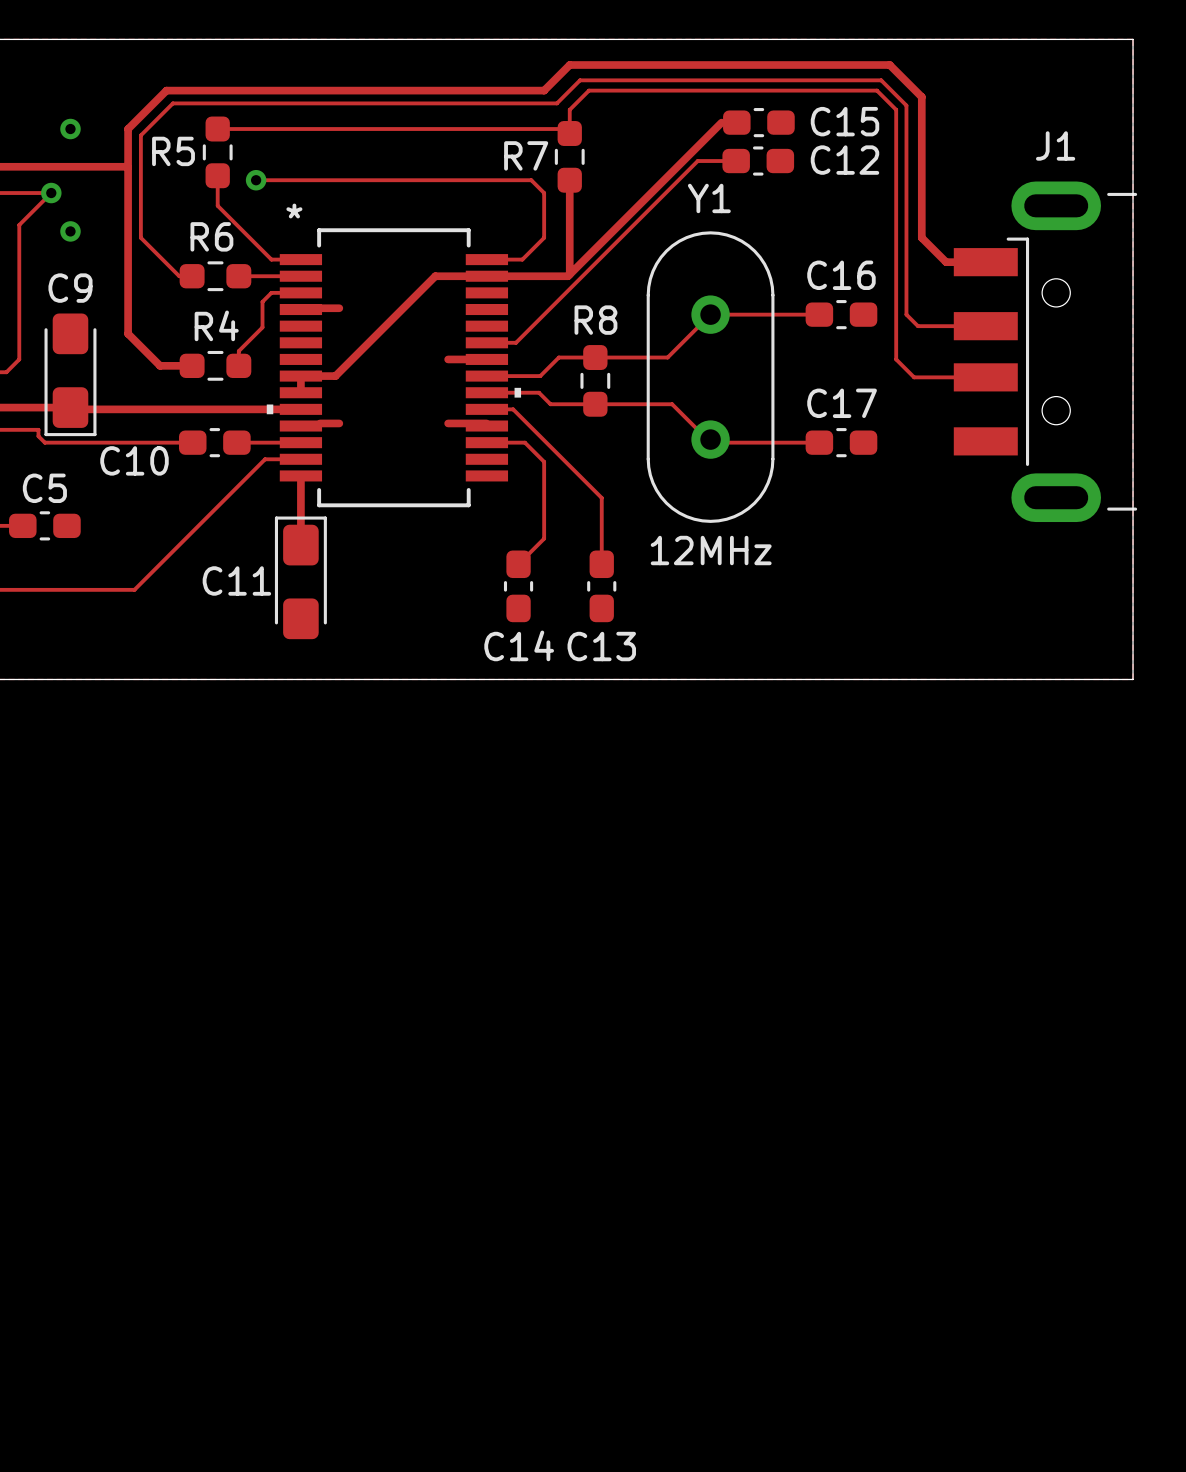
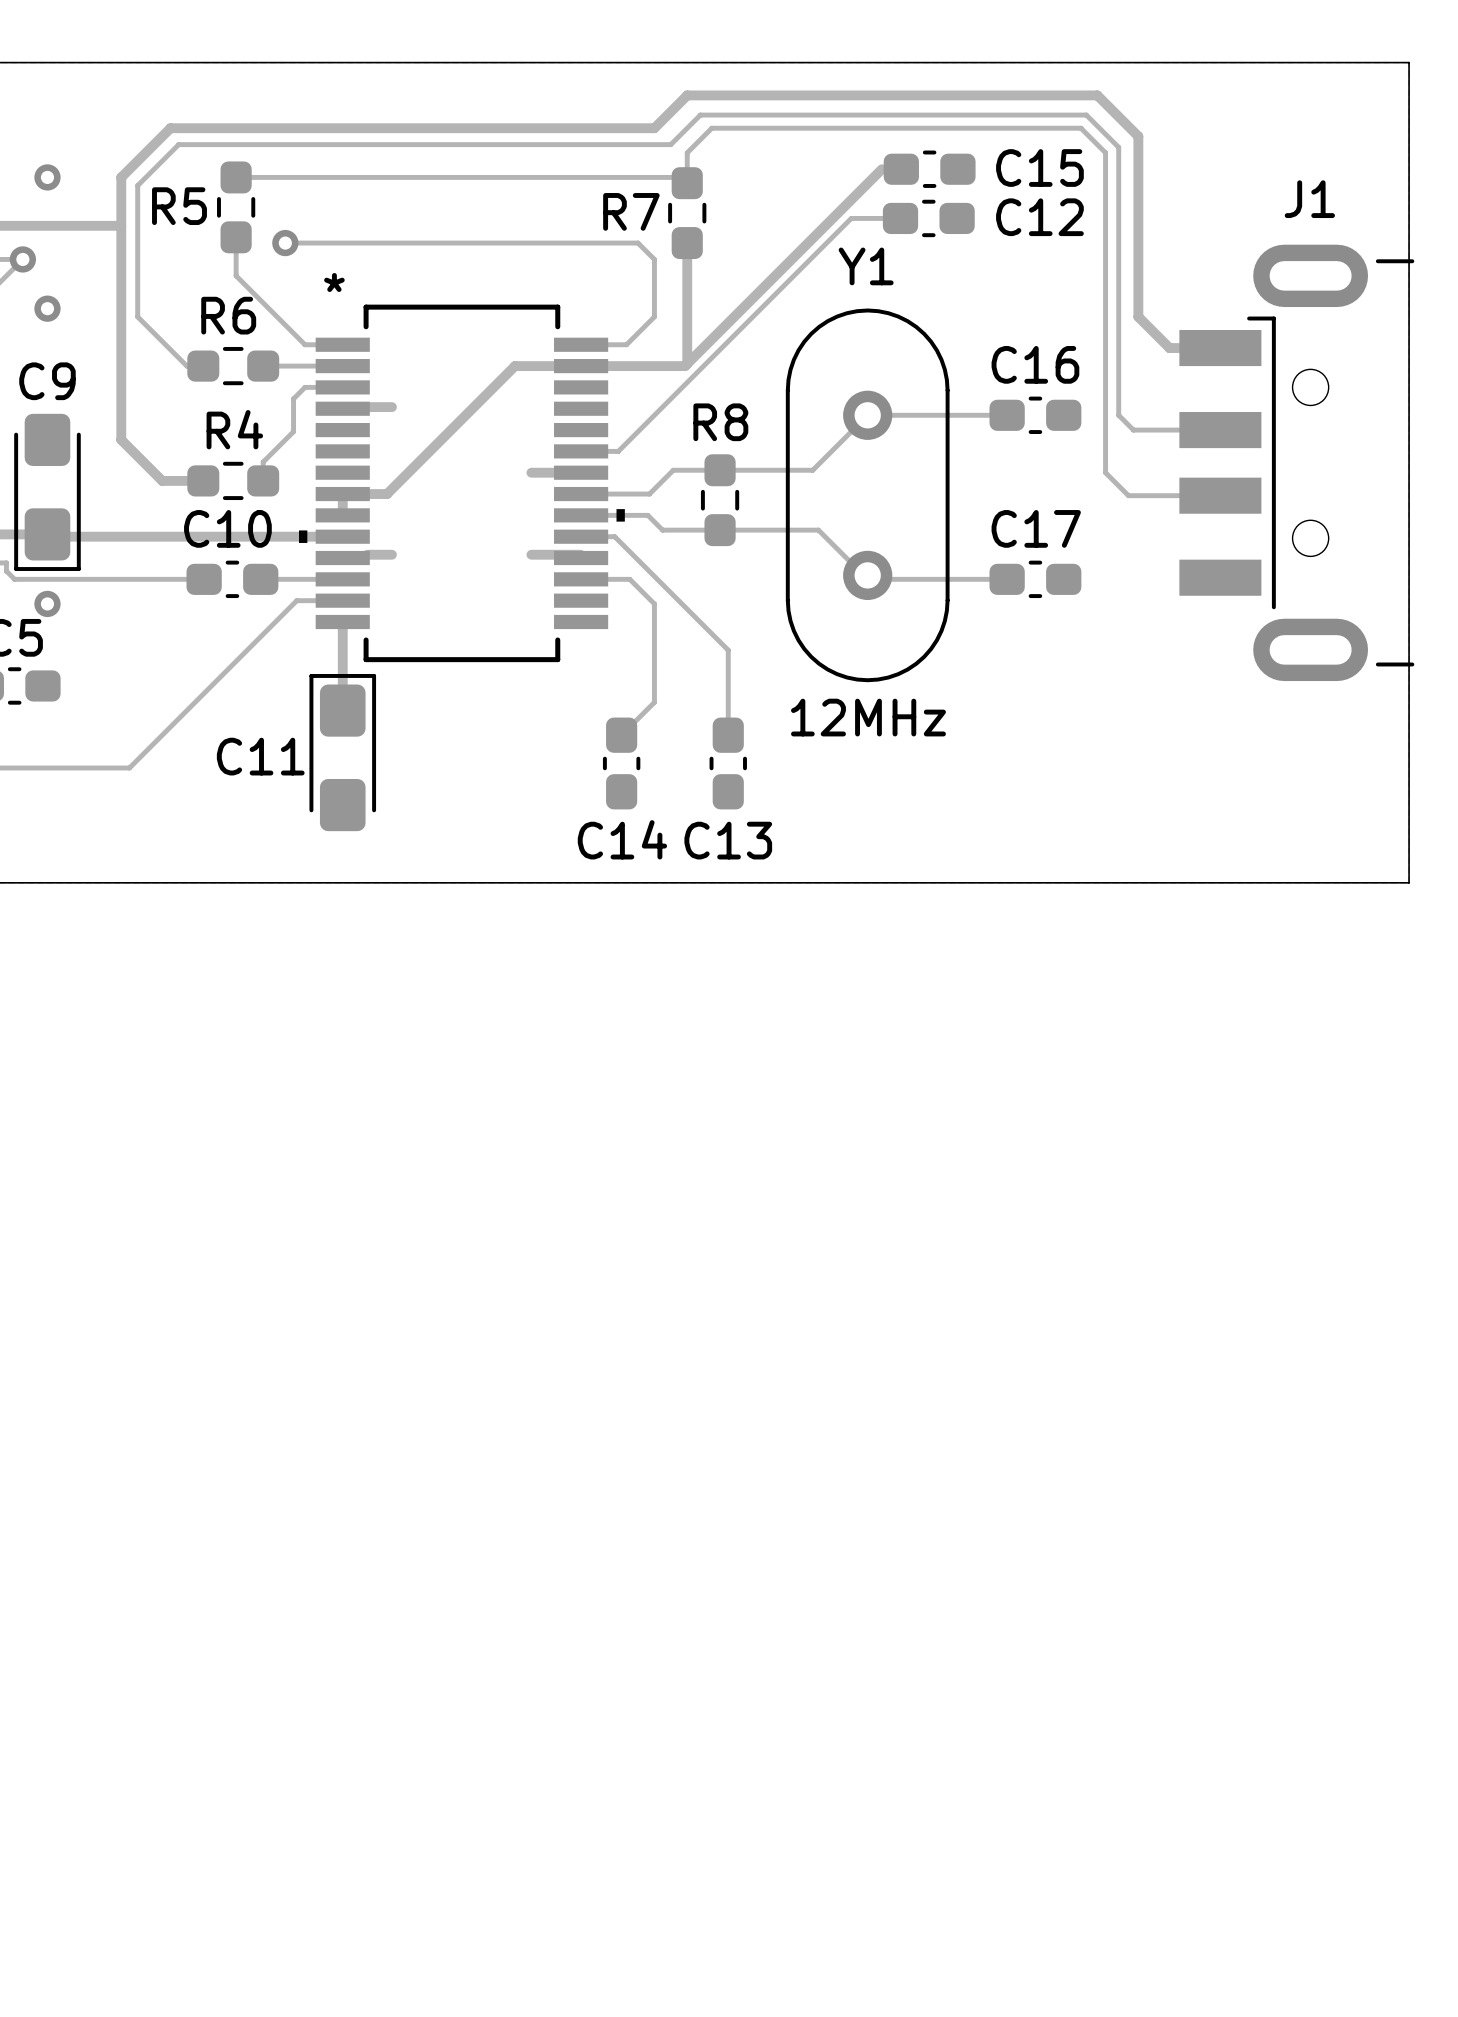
C10 name position: C10 (134, 460) -> C10 (227, 528)
via: none -> (47, 603)

